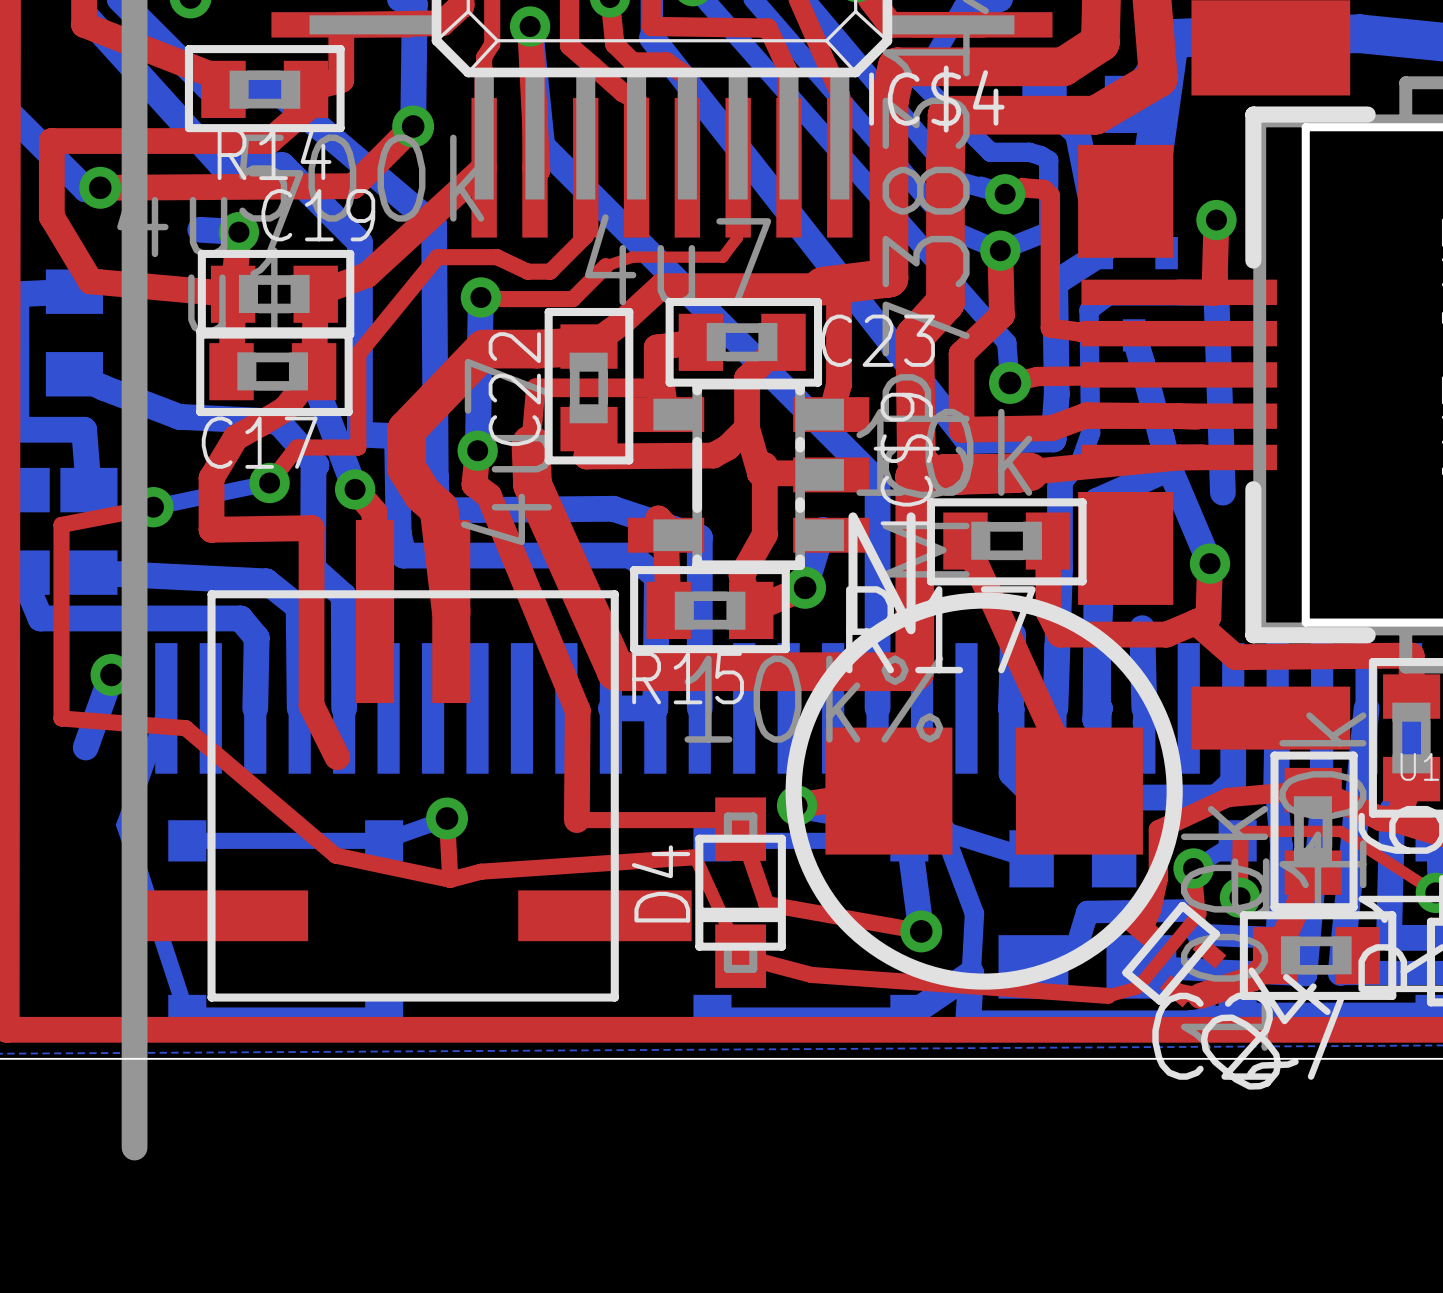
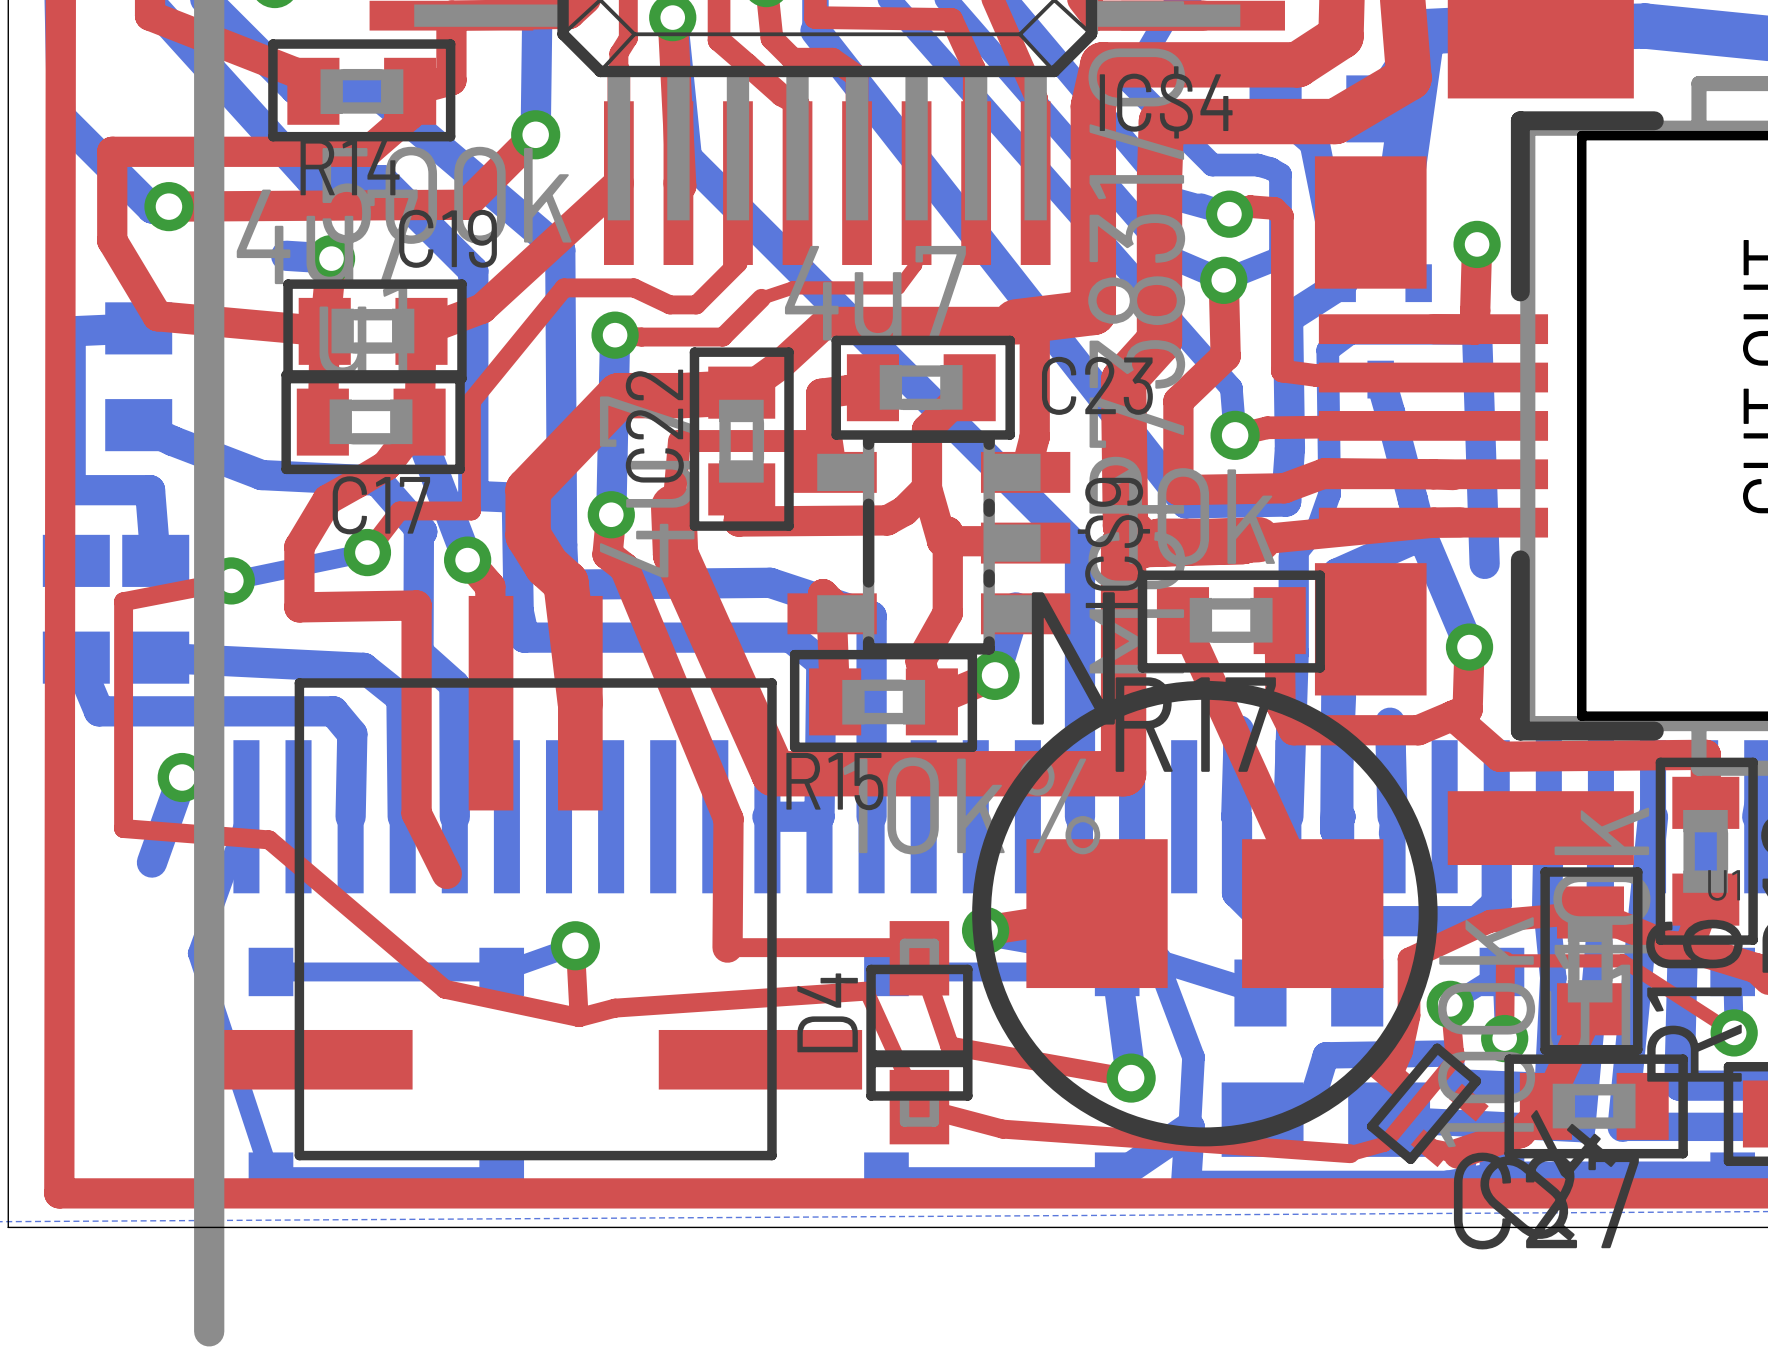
part footprint: [785, 592, 1183, 990] -> [972, 680, 1438, 1147]

